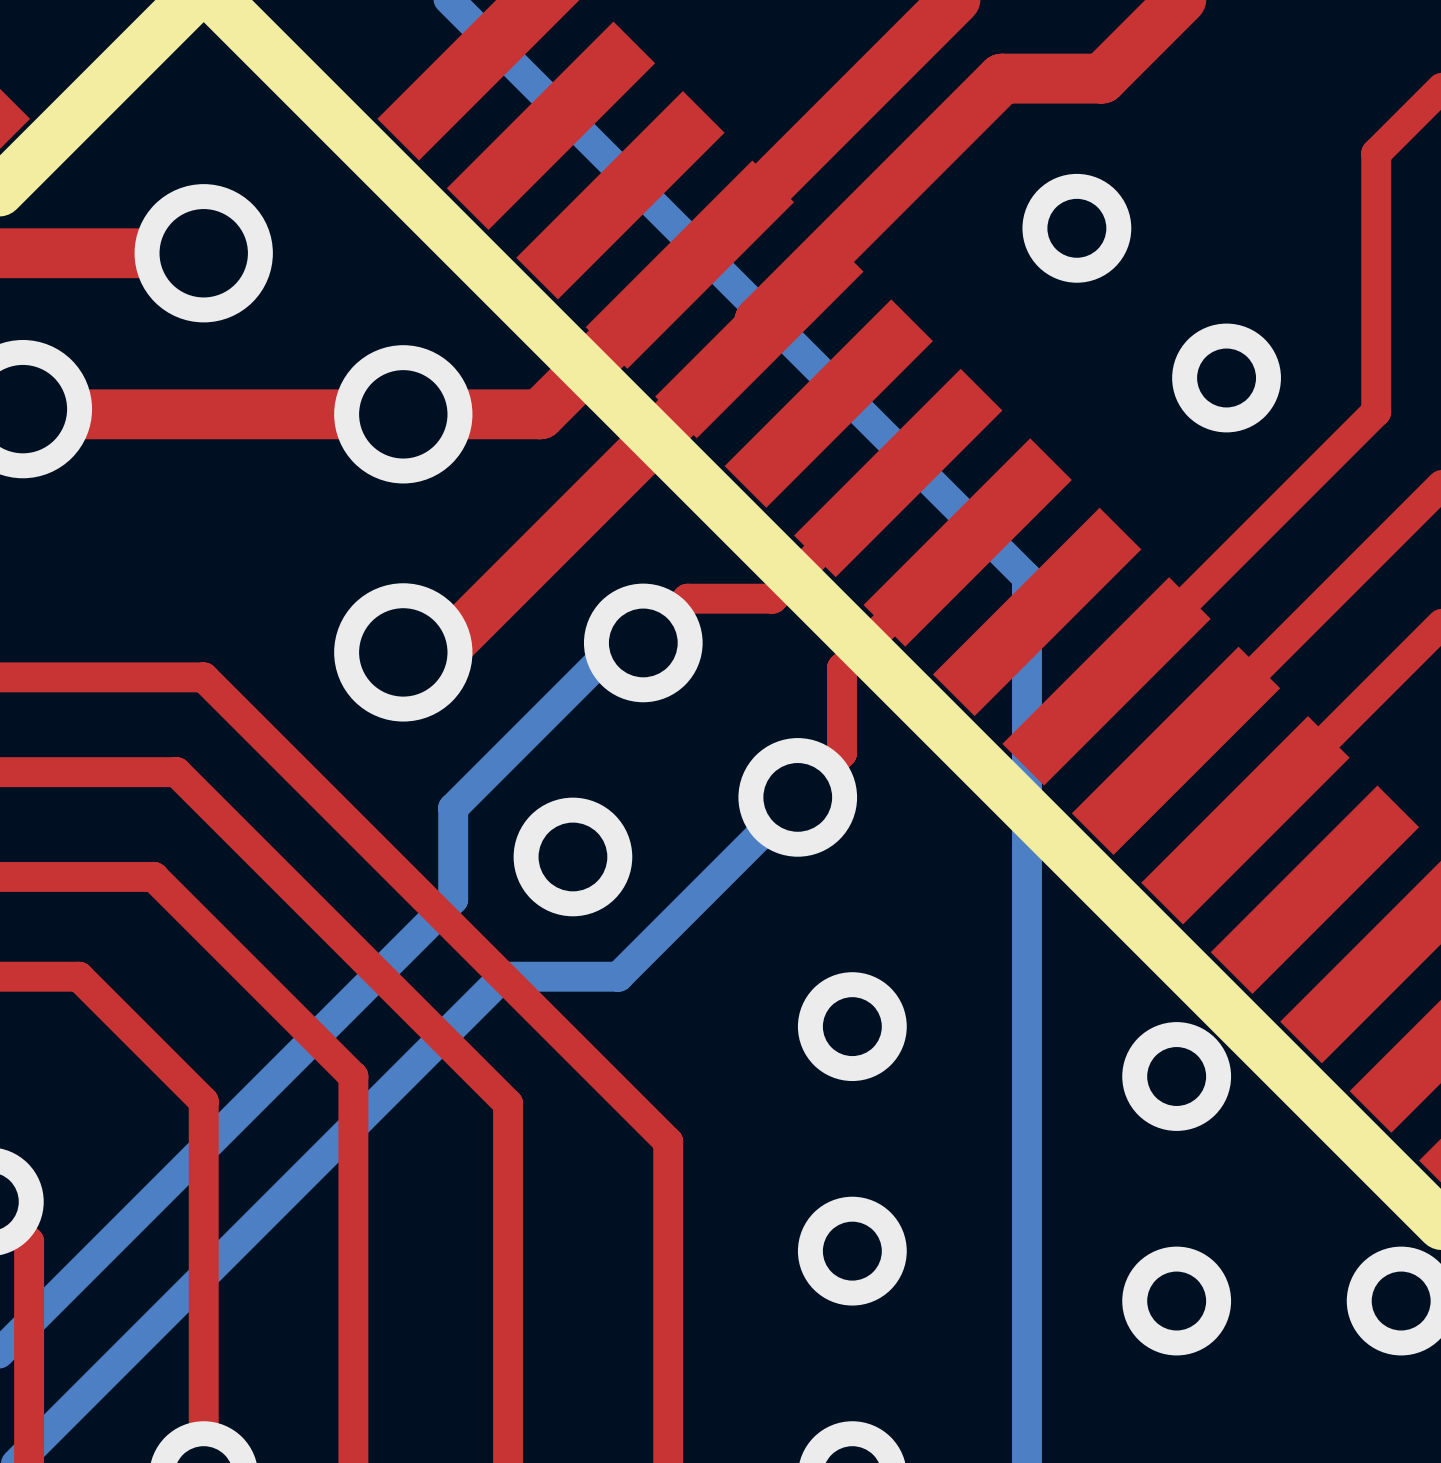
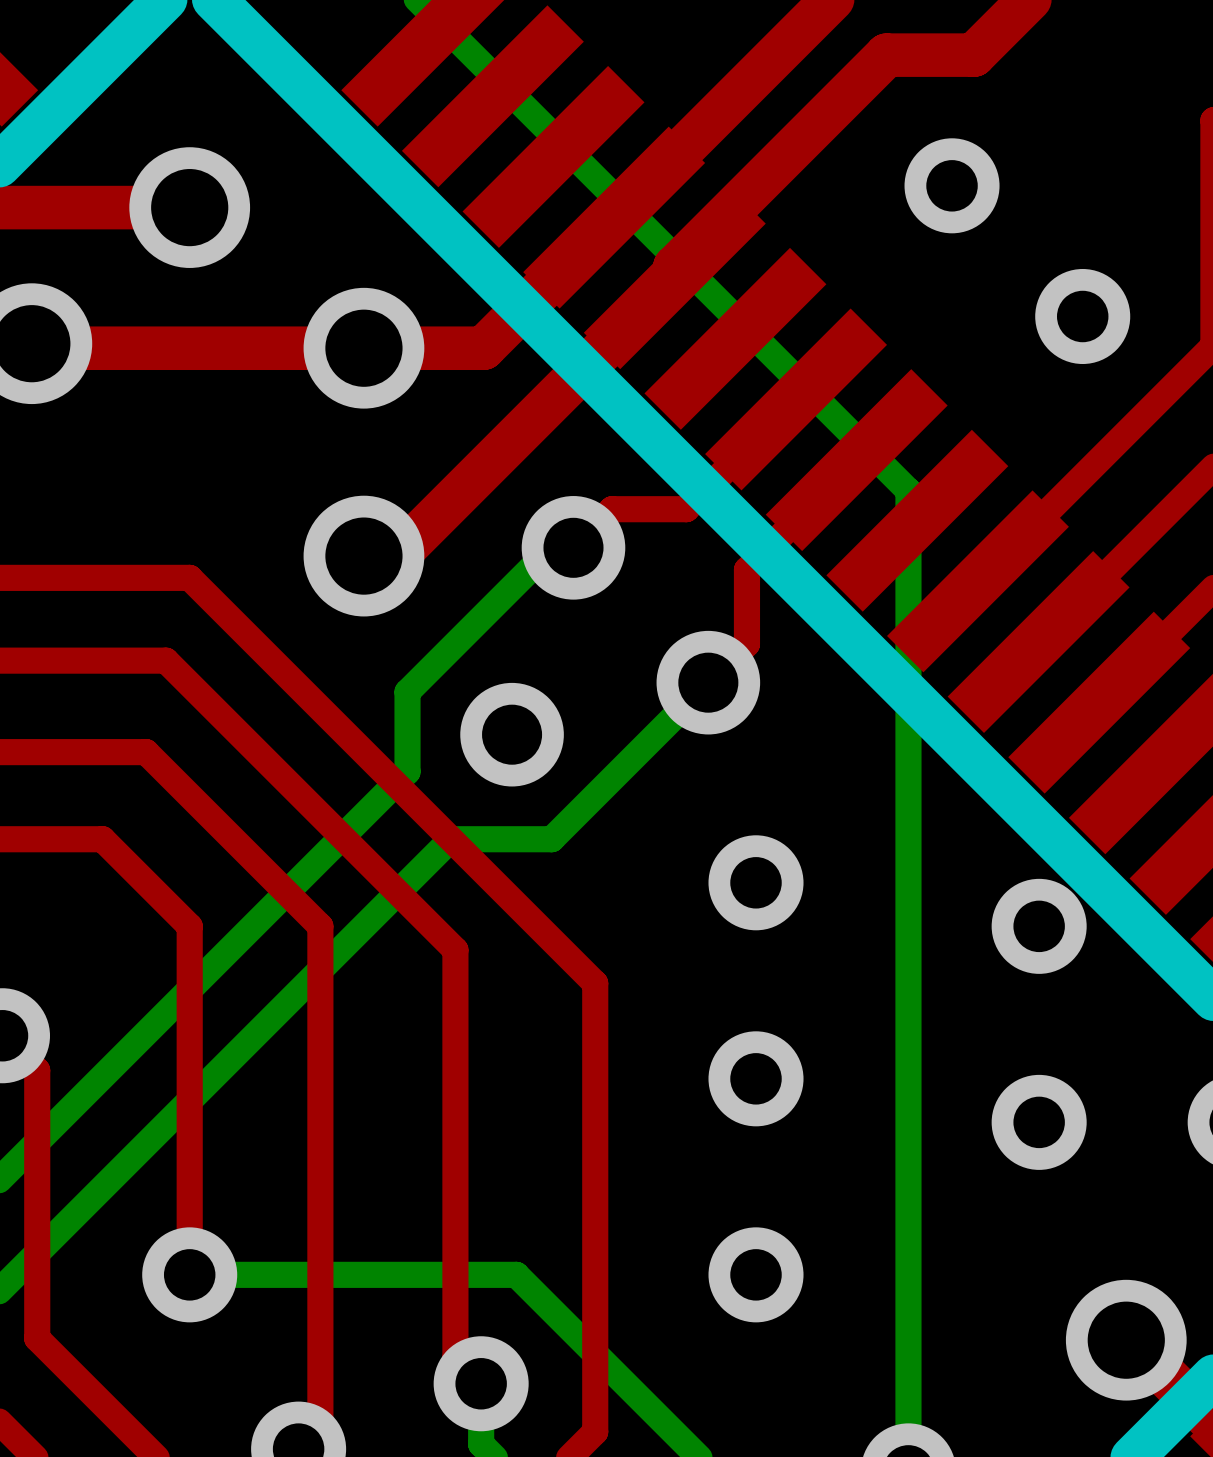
top track: (78, 976) (203, 1101) -> (80, 839) (102, 839) (189, 926) (189, 948)

